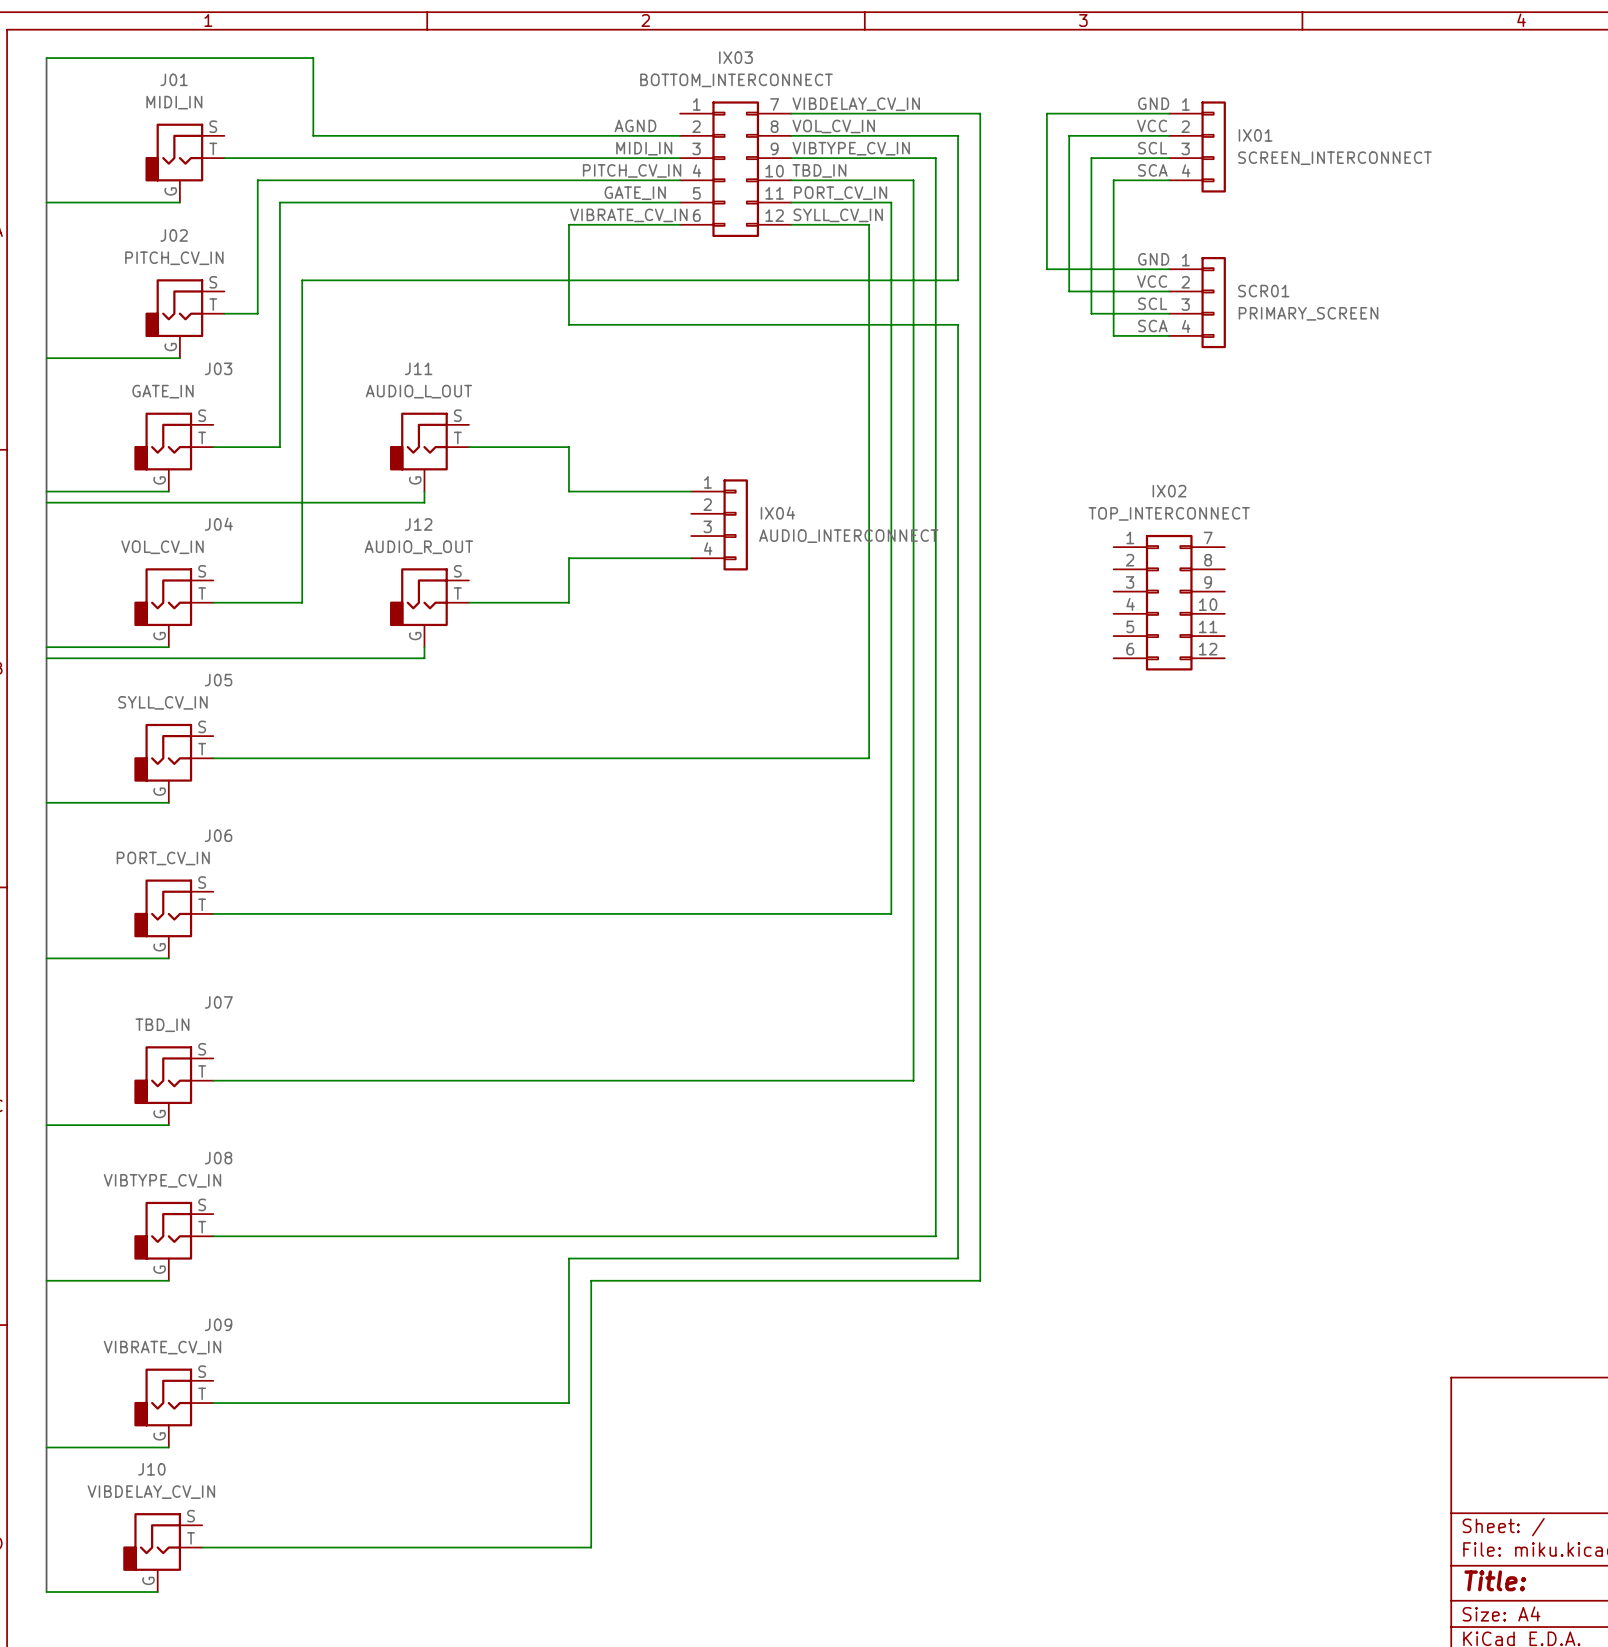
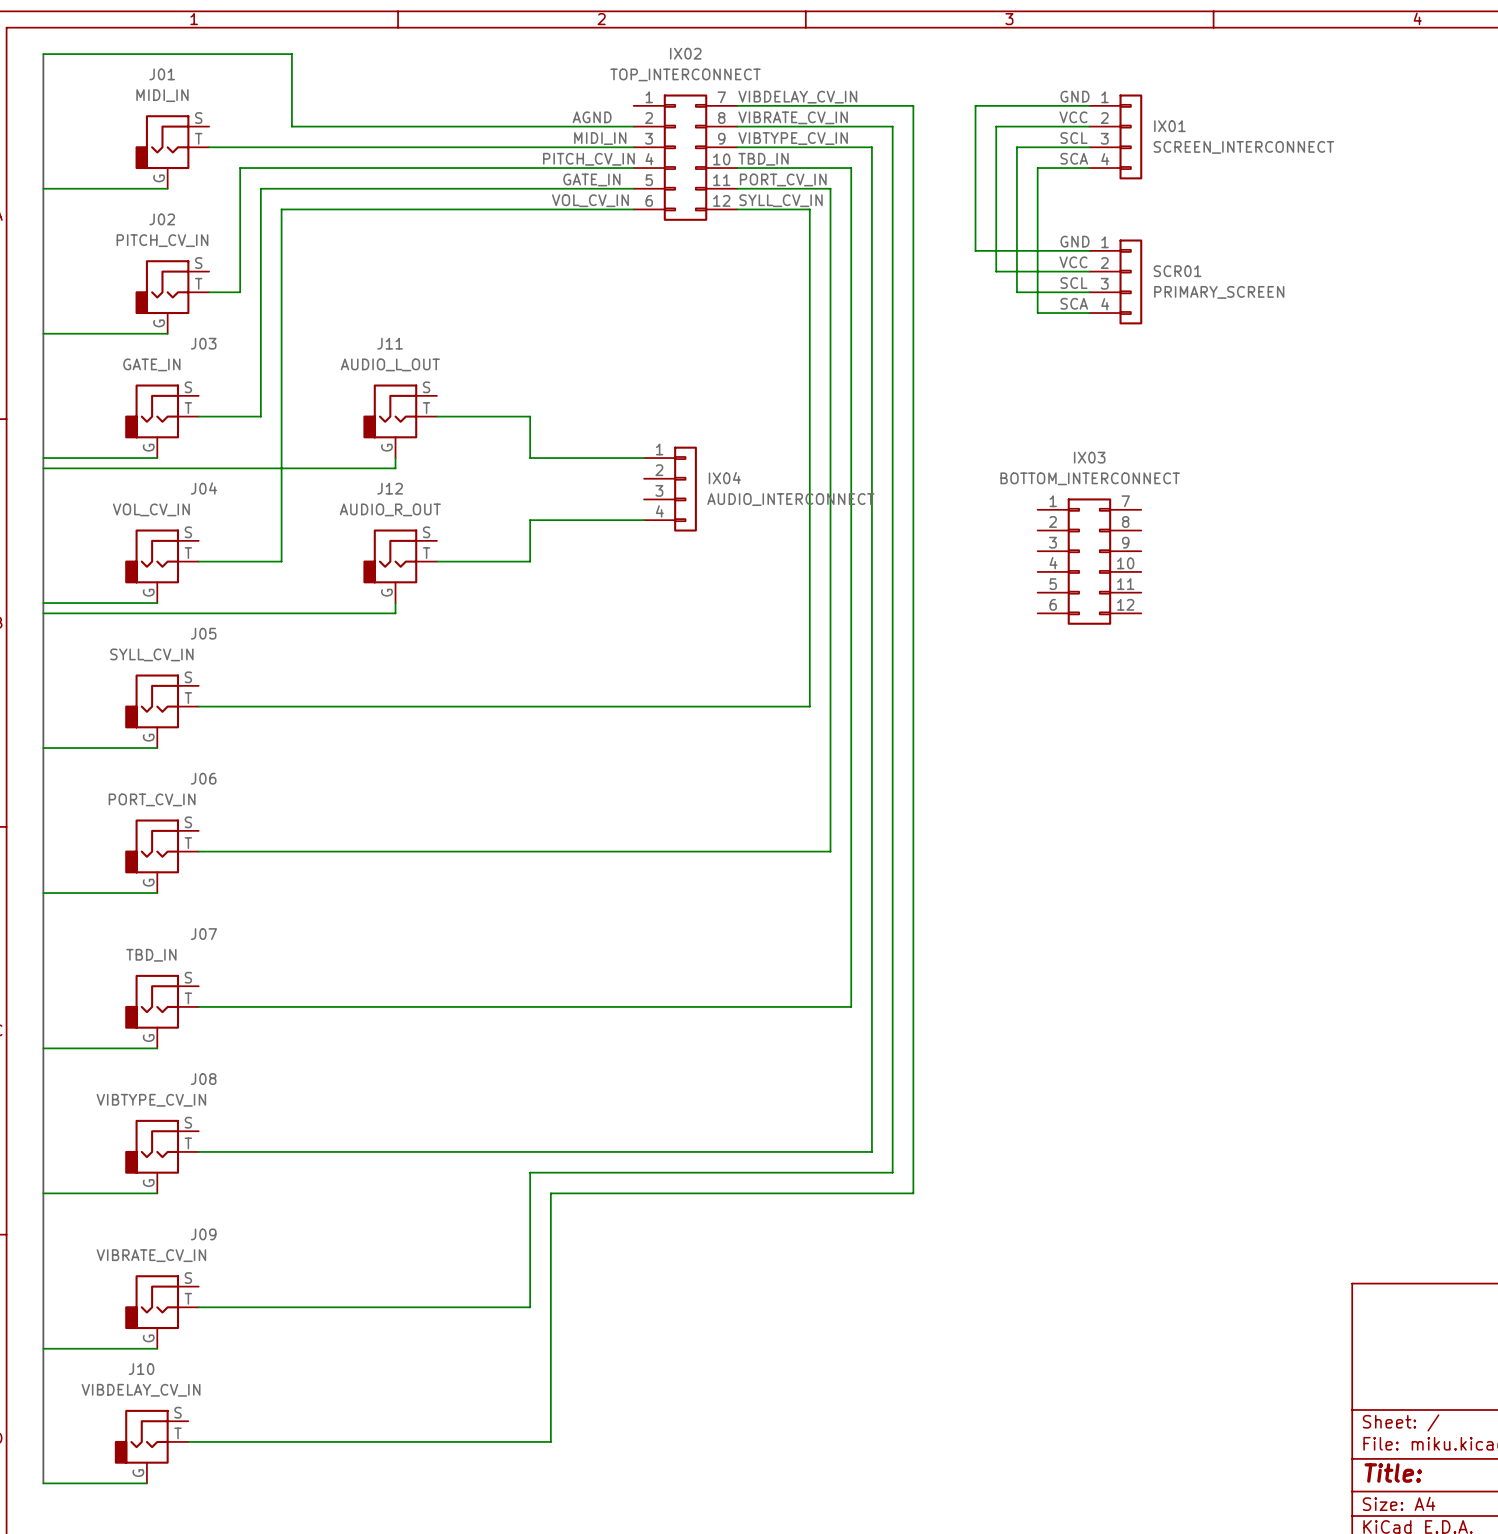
IX03 name: IX03 (735, 57) -> IX02 (685, 53)
IX03 value: BOTTOM_INTERCONNECT (736, 80) -> TOP_INTERCONNECT (685, 74)
label: VOL_CV_IN (833, 126) -> VIBRATE_CV_IN (793, 117)
label: VIBRATE_CV_IN (628, 215) -> VOL_CV_IN (590, 200)
wire: (568, 224) (568, 324) (958, 324) -> (892, 261) (892, 302)
wire: (302, 280) (958, 280) -> (281, 261) (281, 209) (530, 209)
IX02 name: IX02 (1169, 491) -> IX03 (1089, 457)
IX02 value: TOP_INTERCONNECT (1169, 513) -> BOTTOM_INTERCONNECT (1090, 478)

